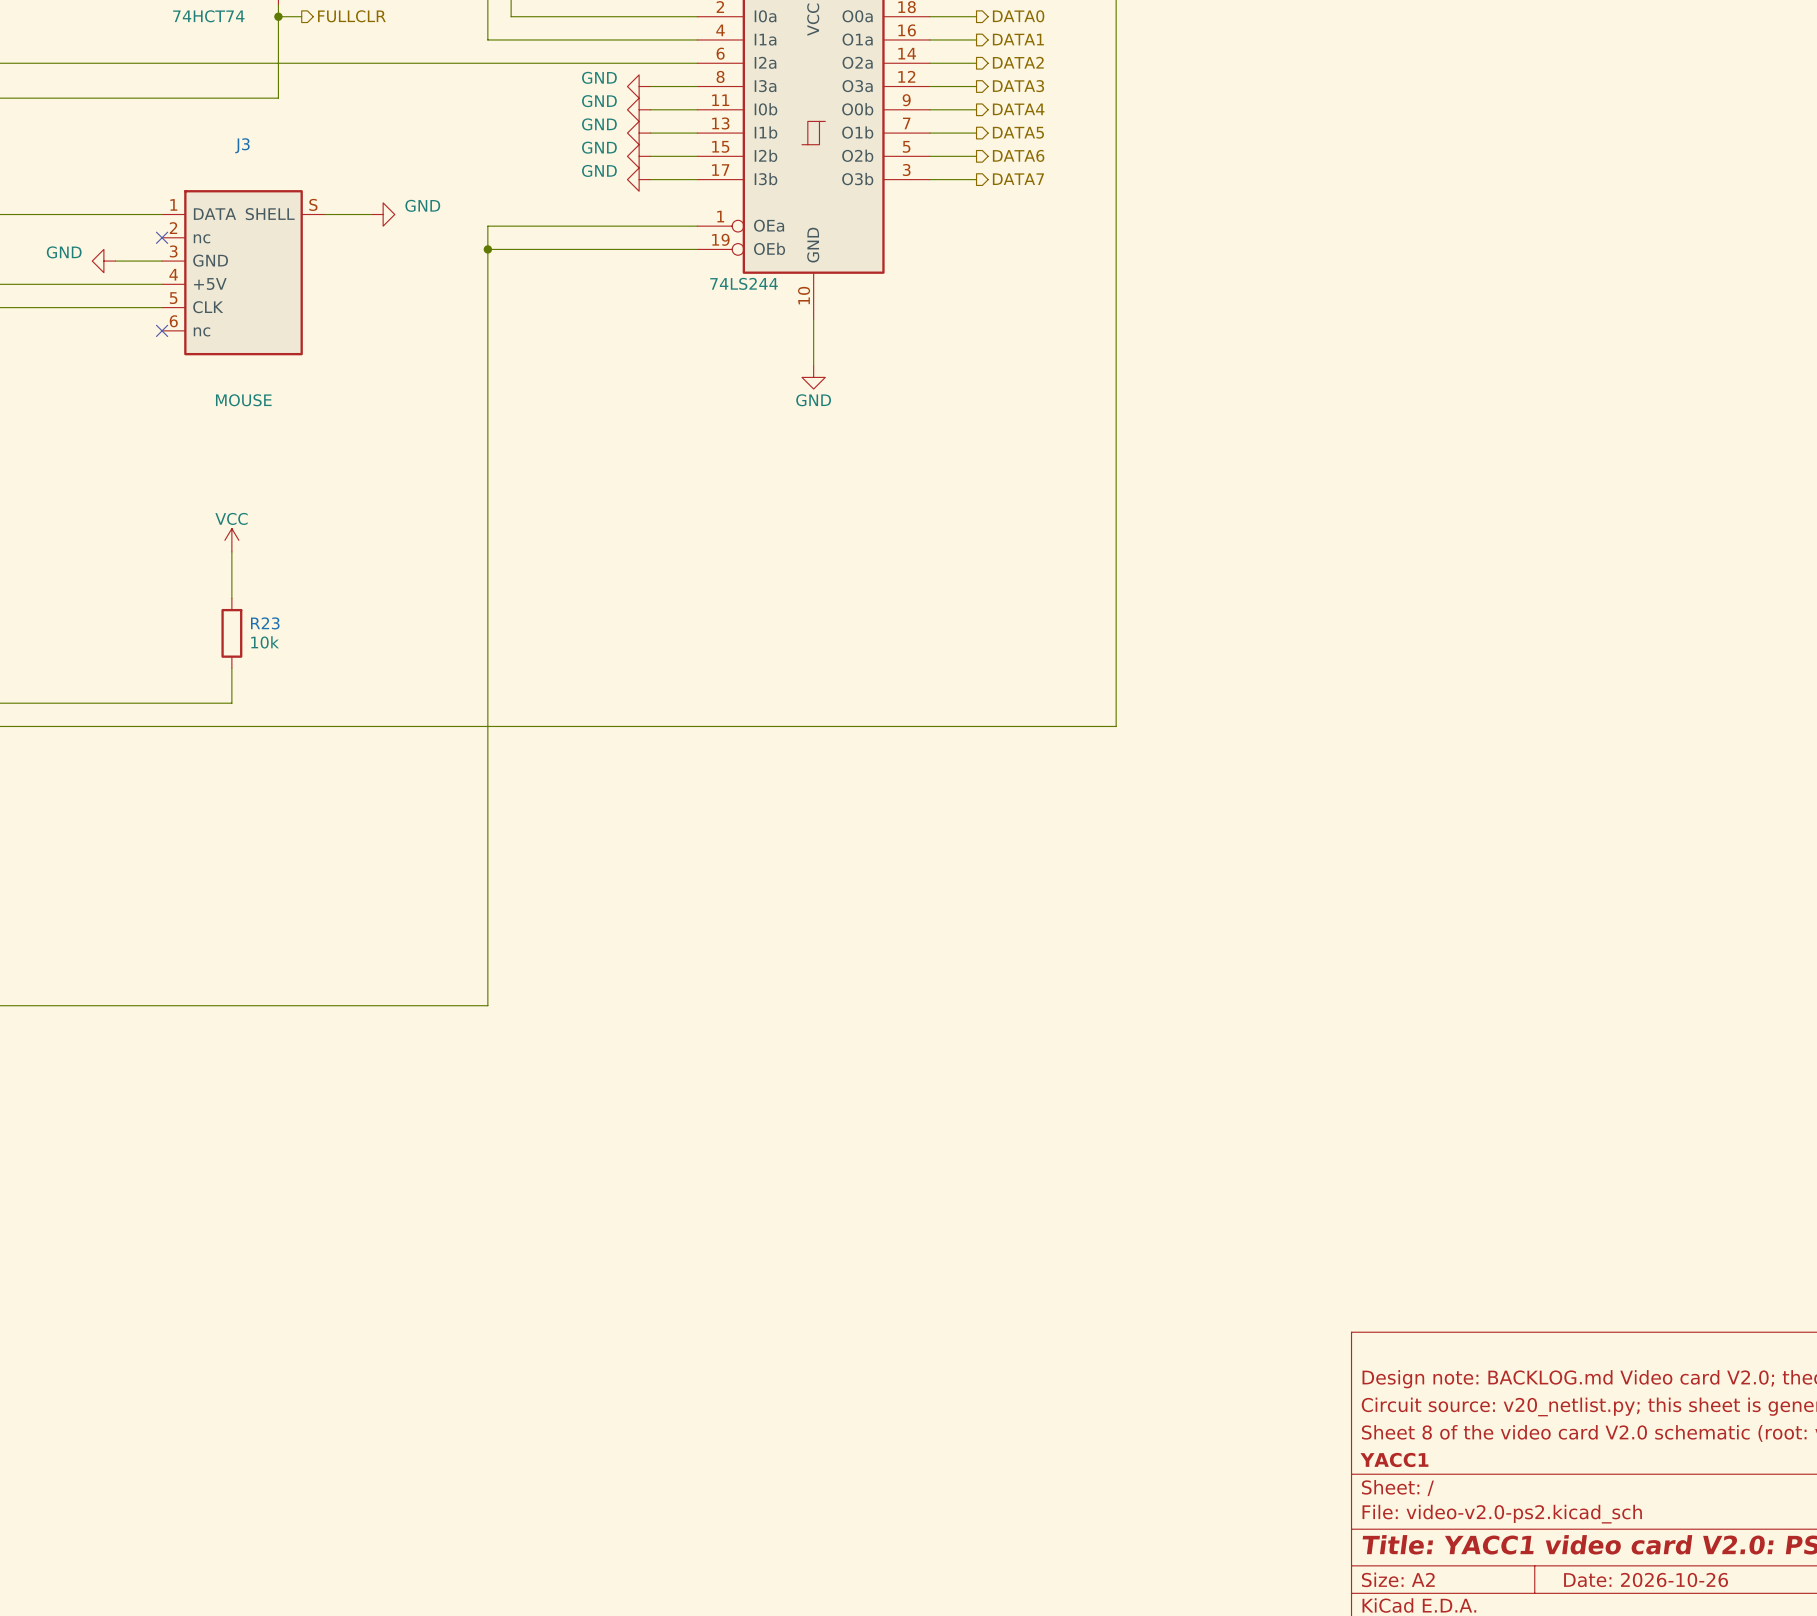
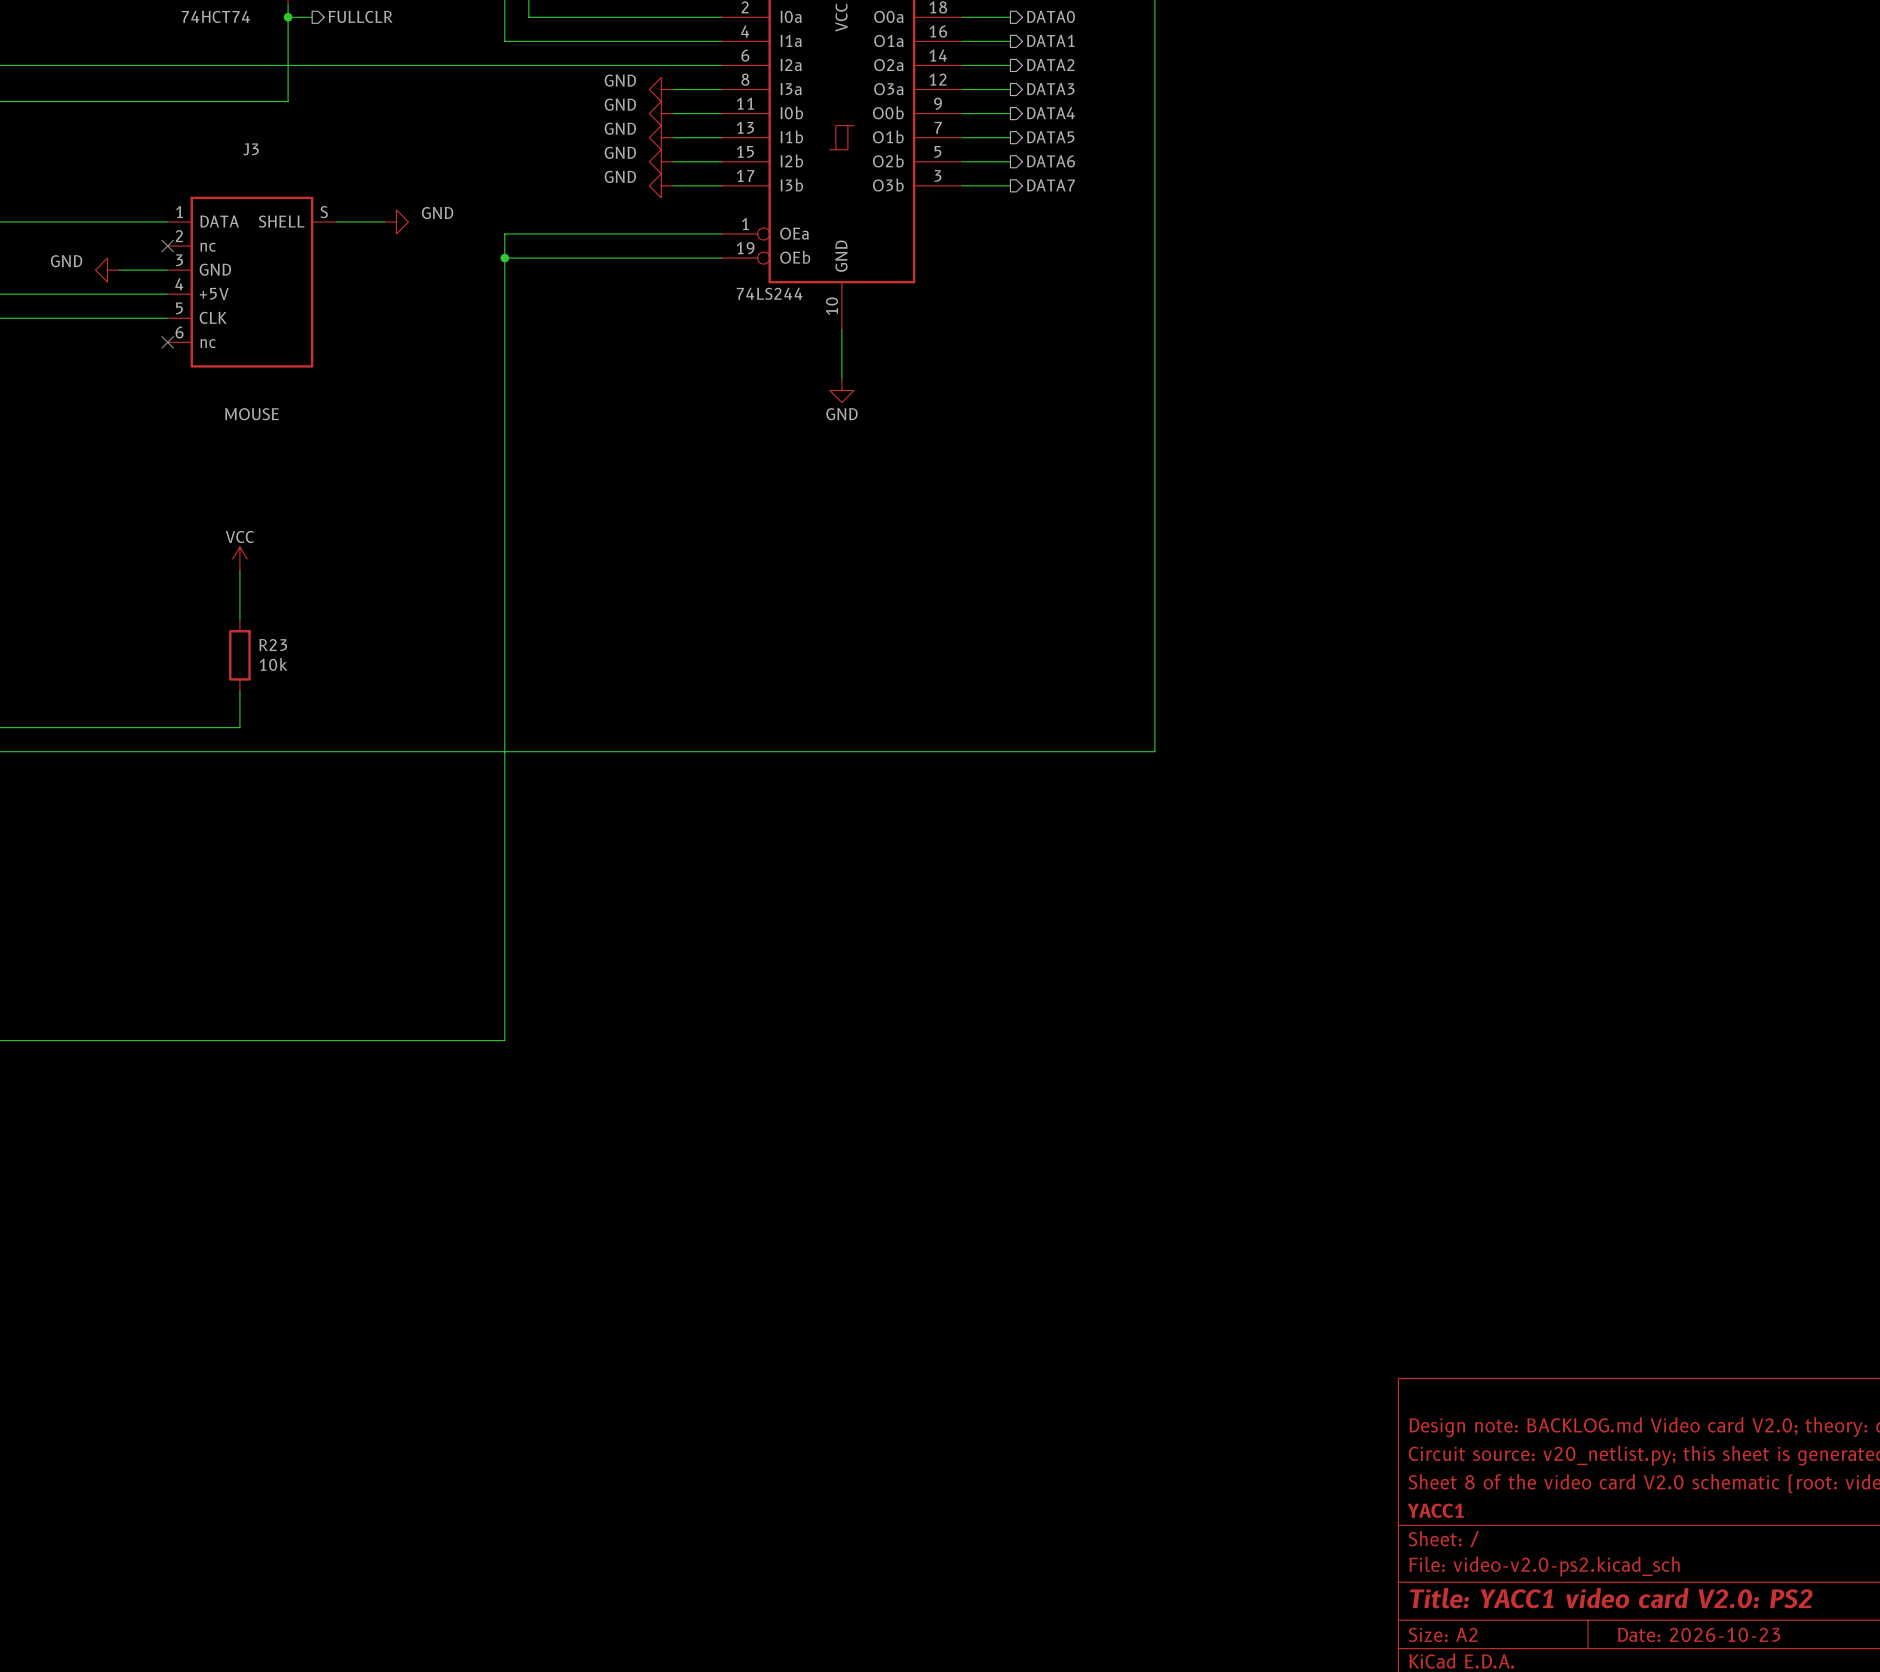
title block: Date: 2026-10-26 (1646, 1580) -> Date: 2026-10-23 (1699, 1634)

